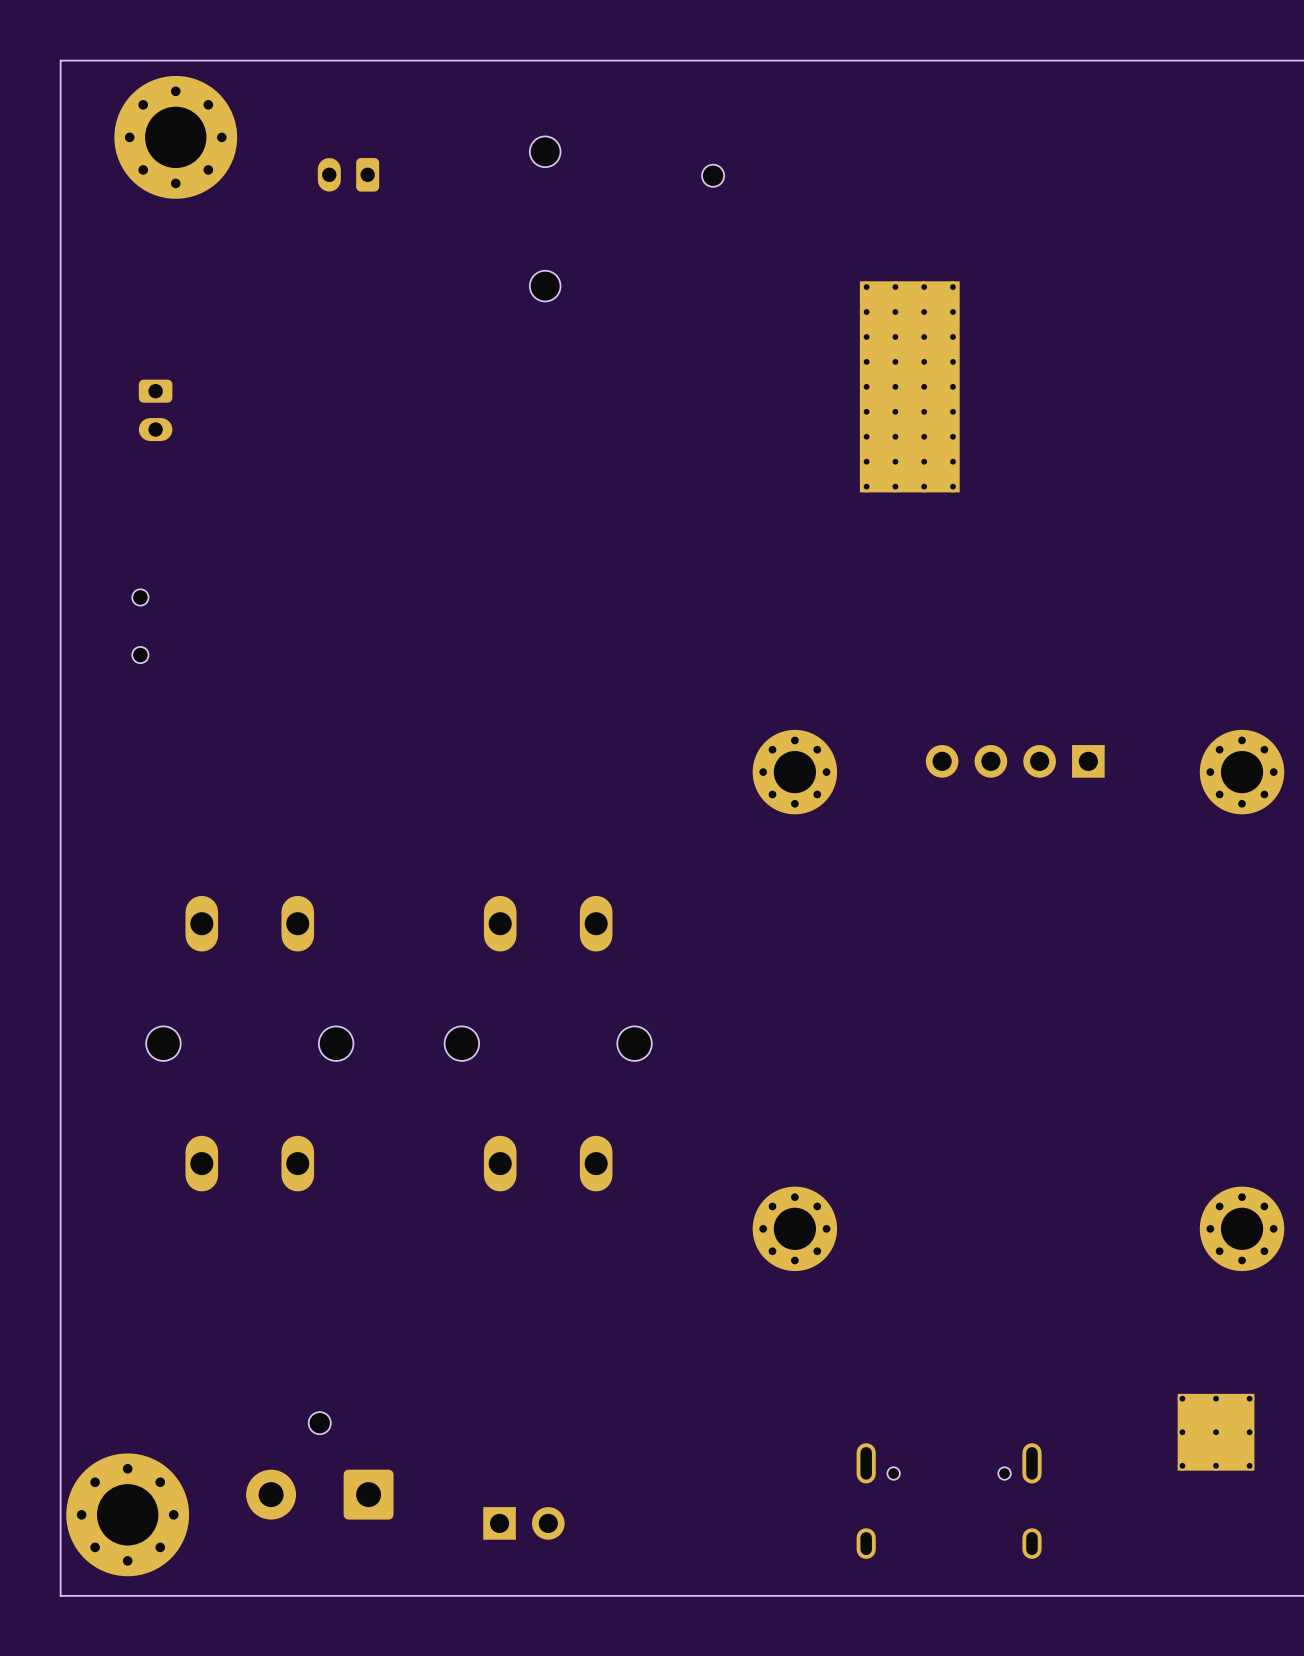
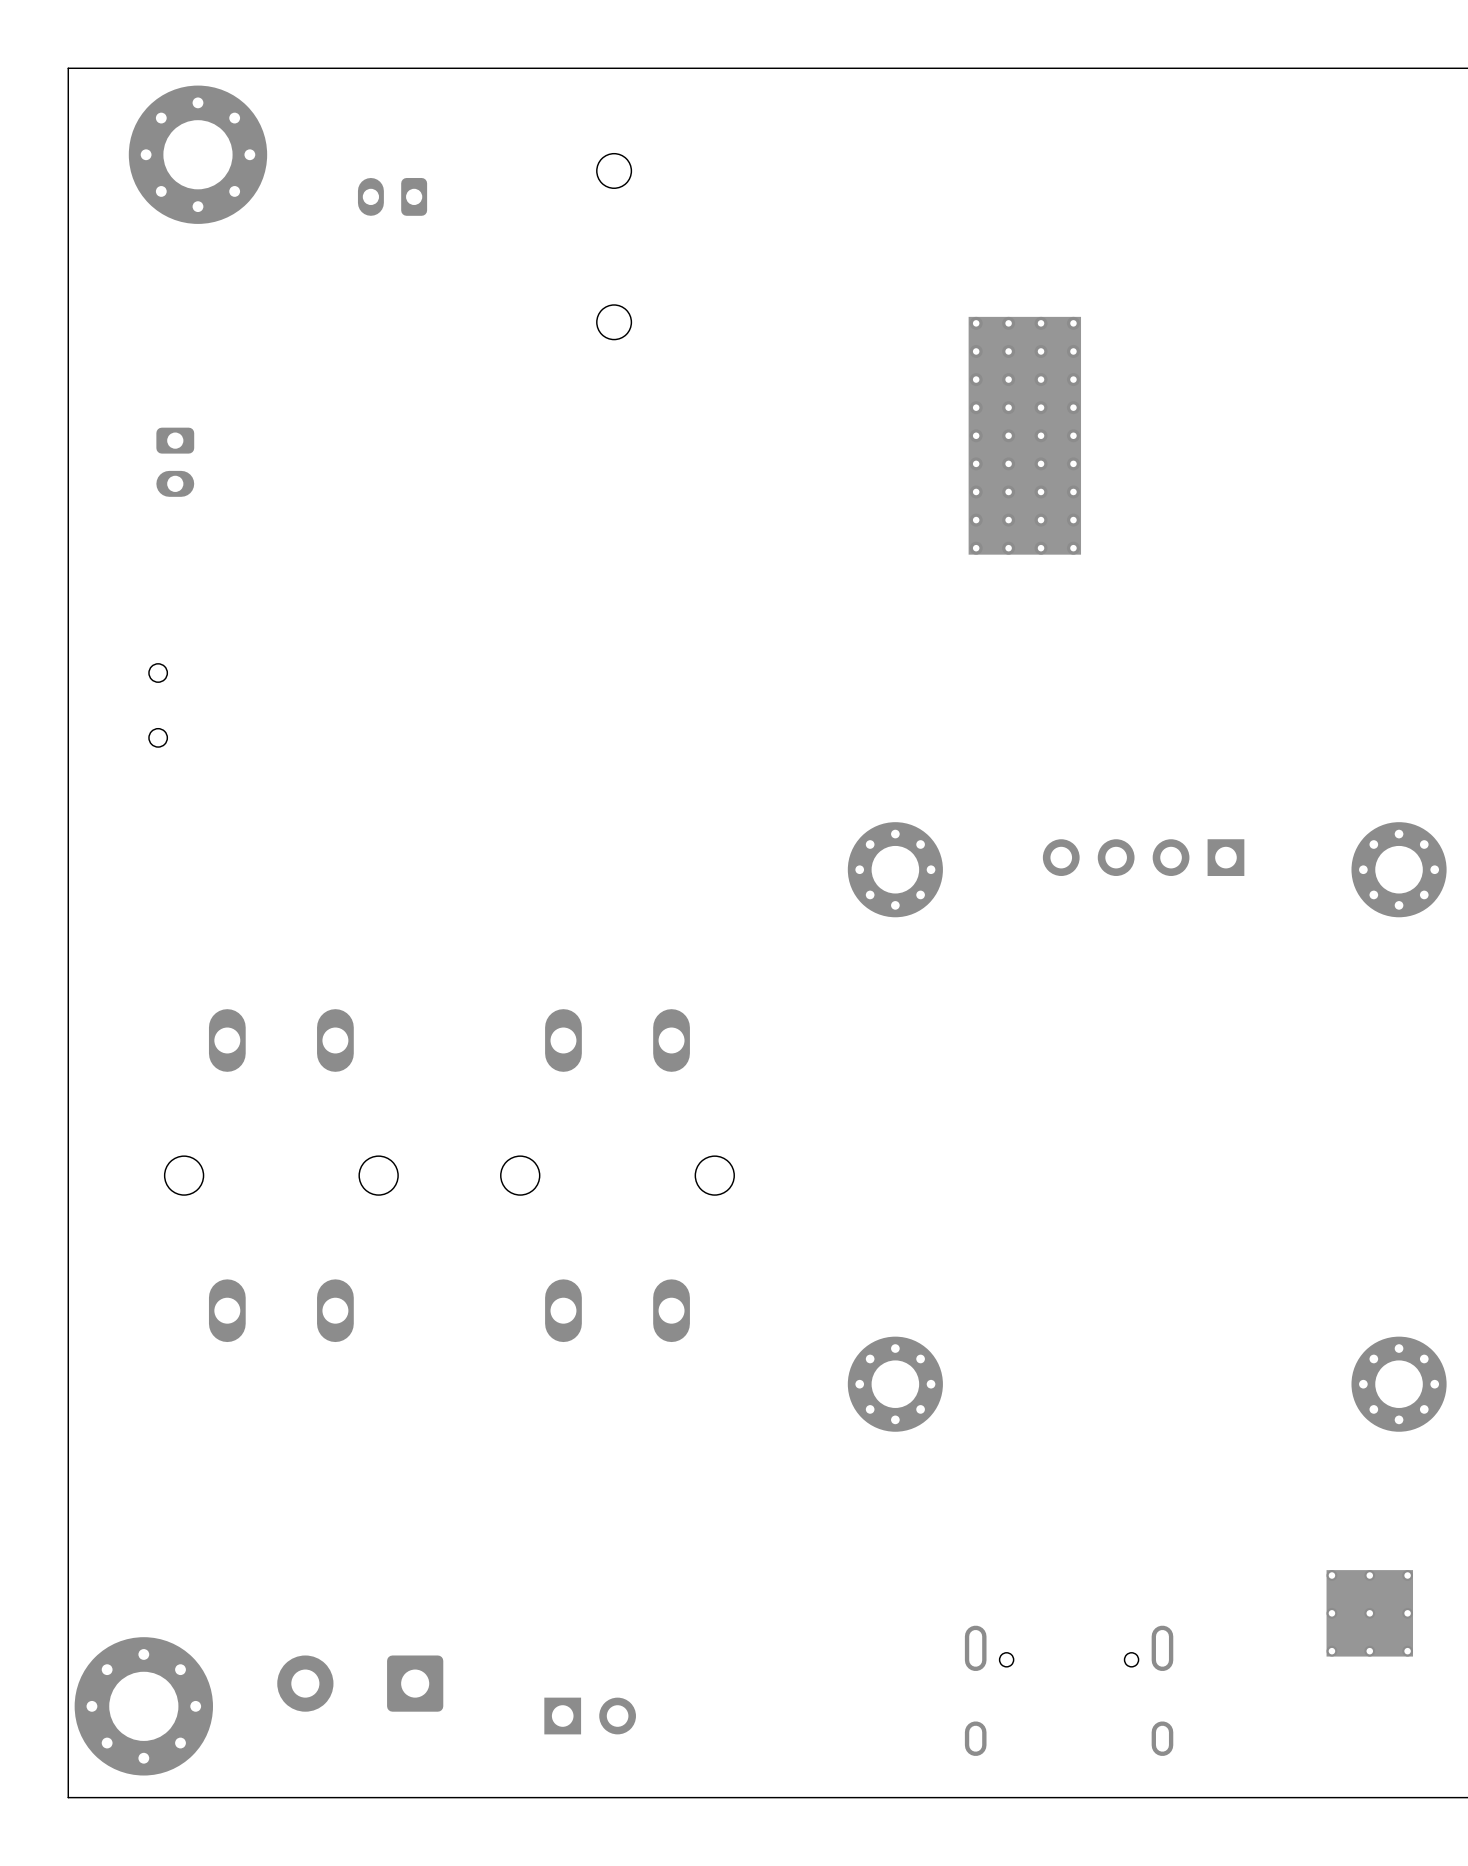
part: (713, 175) -> none
part: (319, 1423) -> none

